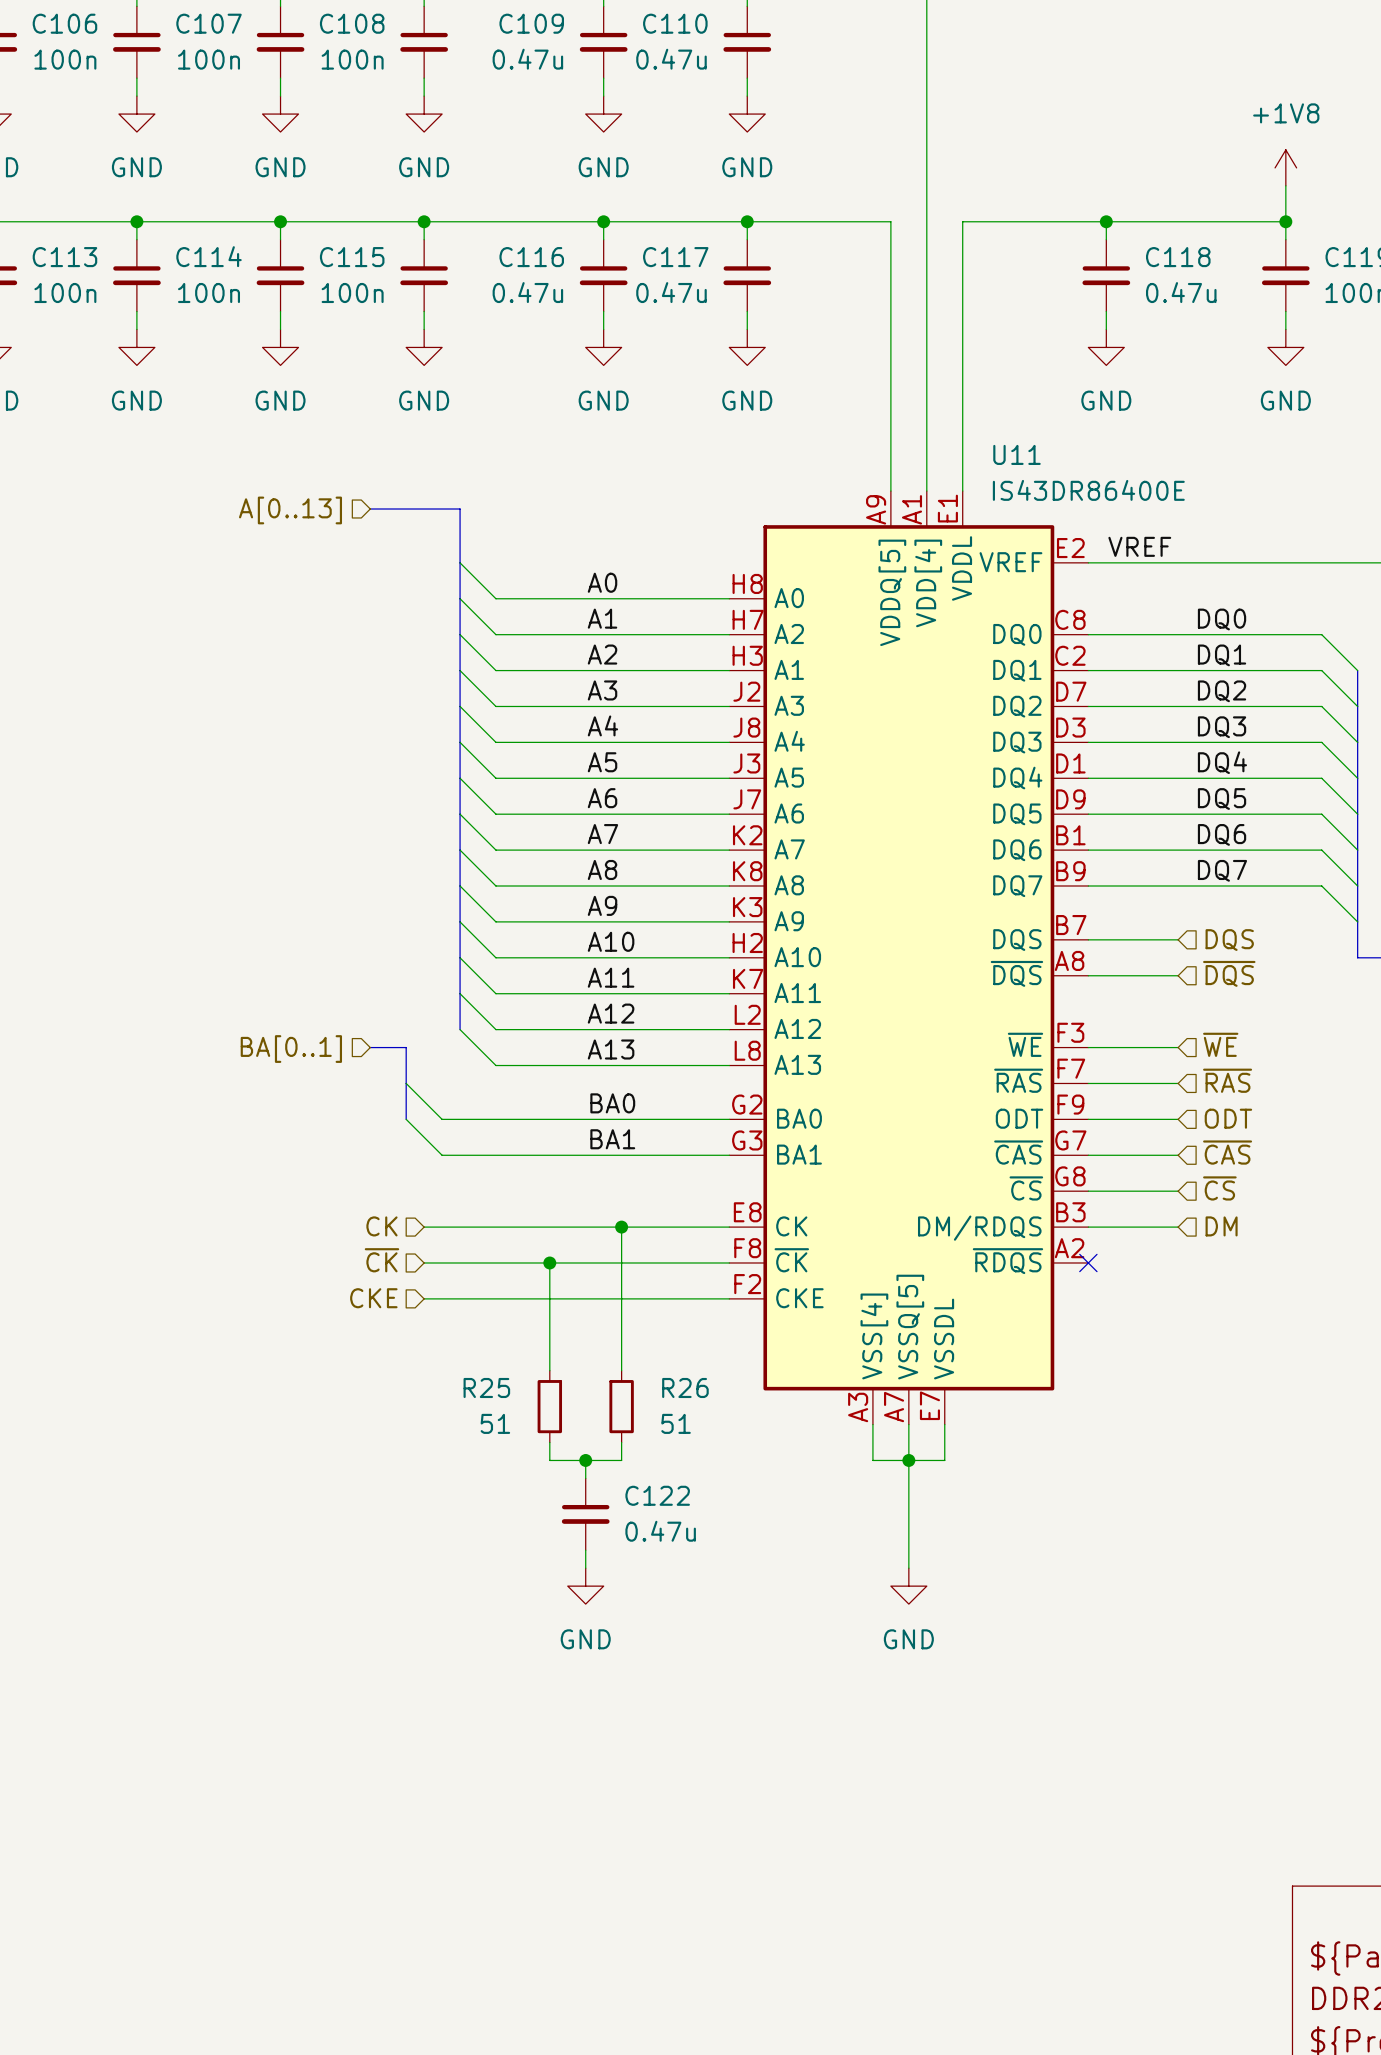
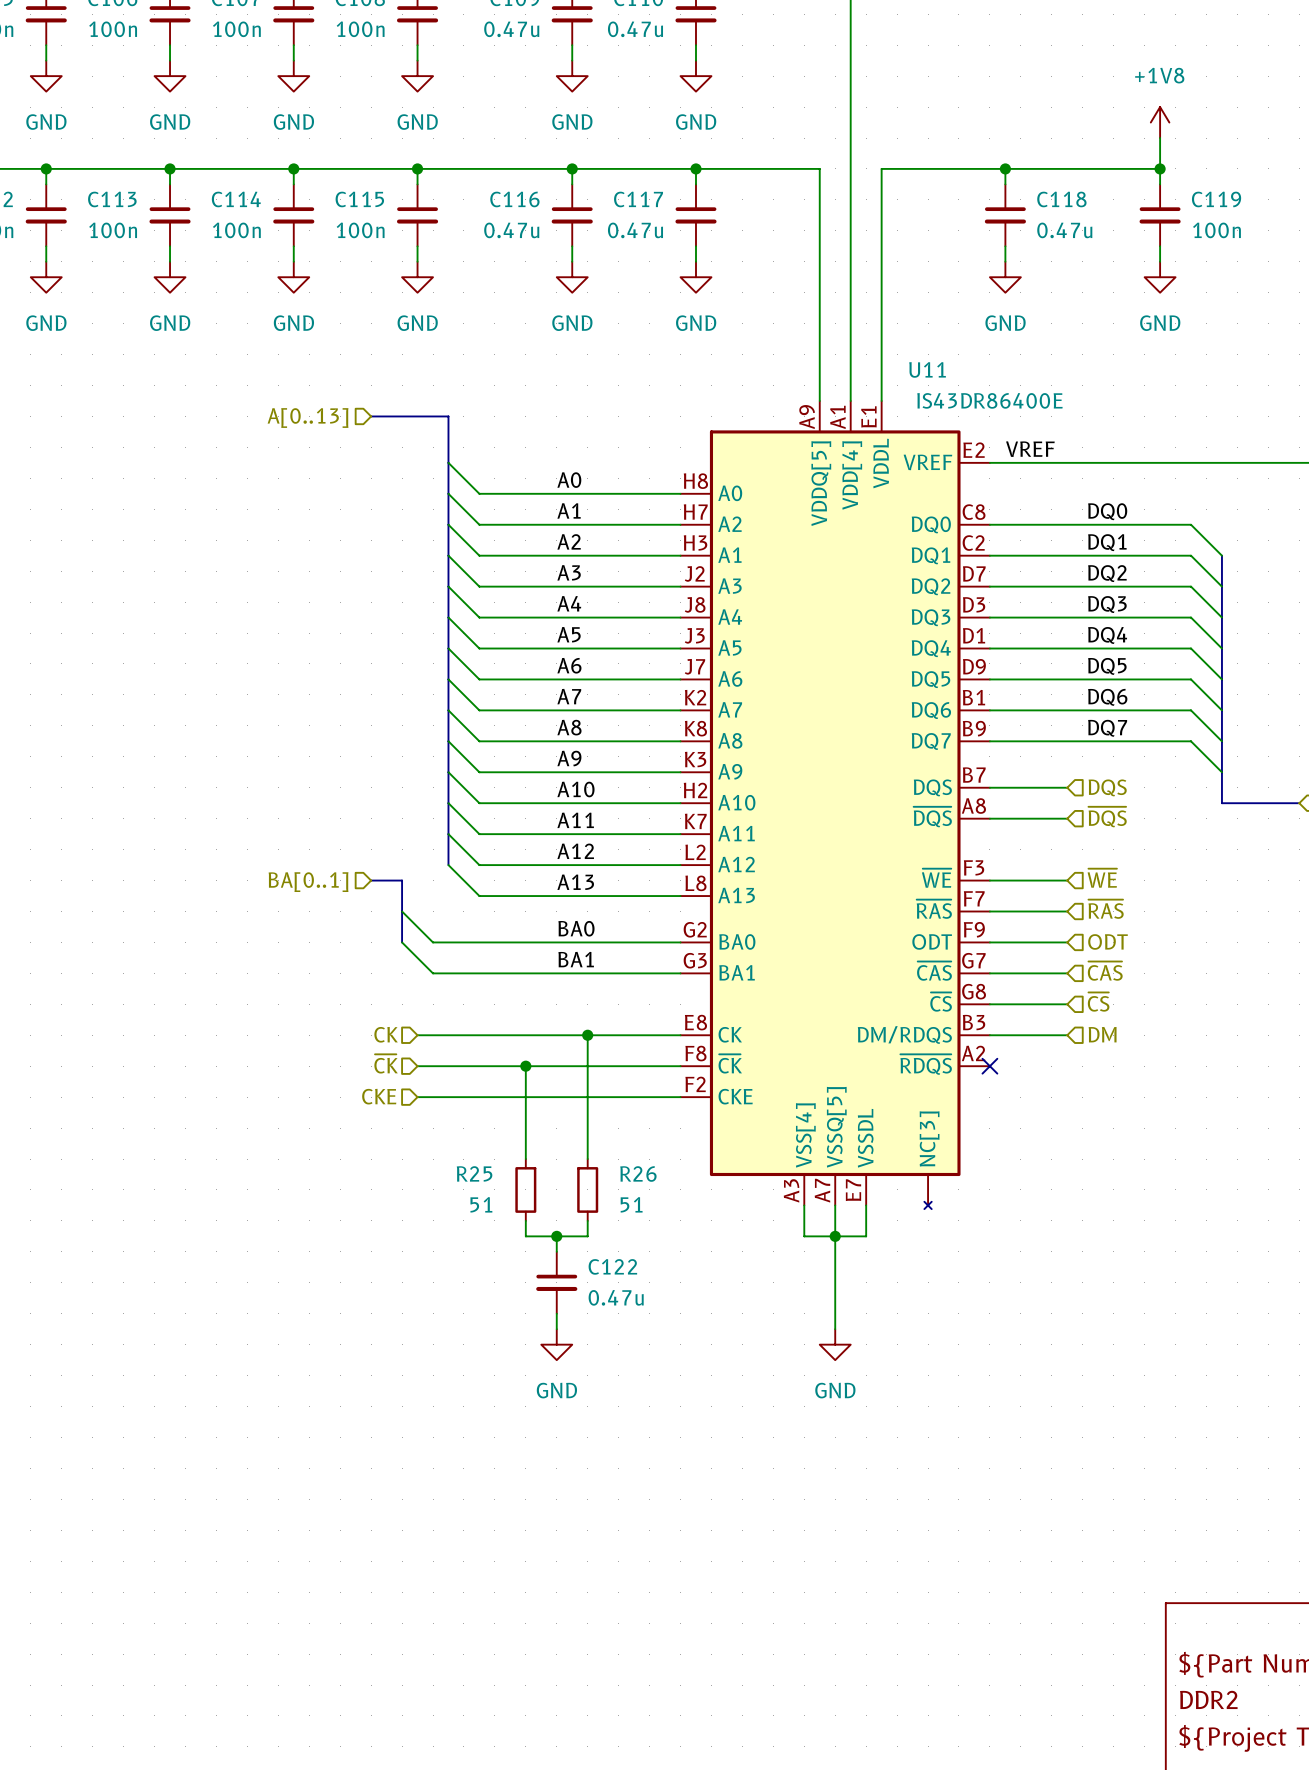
U11 symbol: [729, 491, 1089, 1425] -> [680, 400, 990, 1210]

